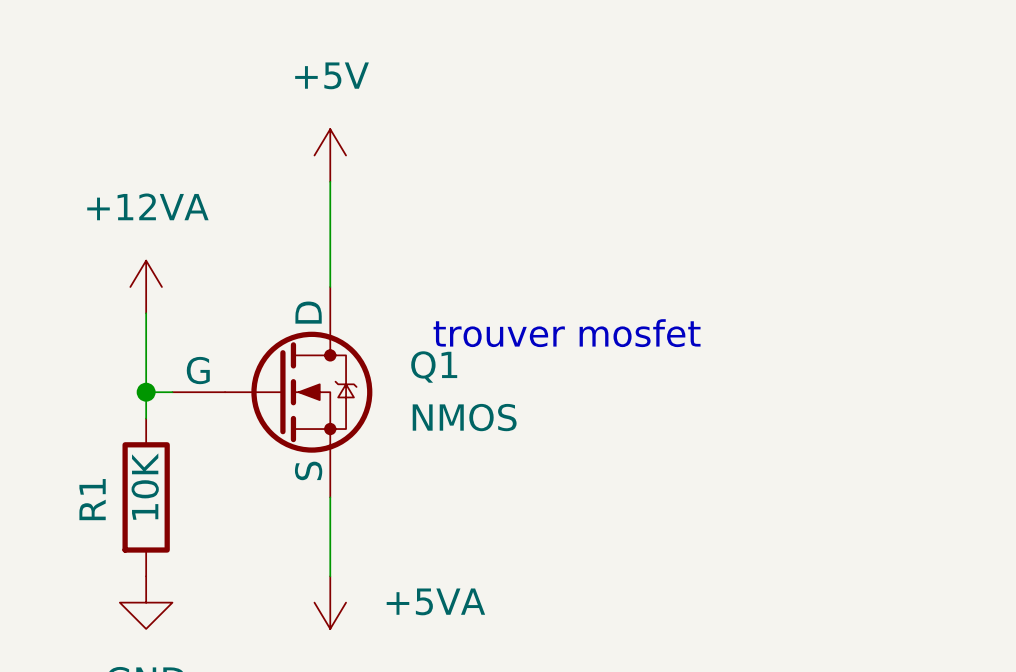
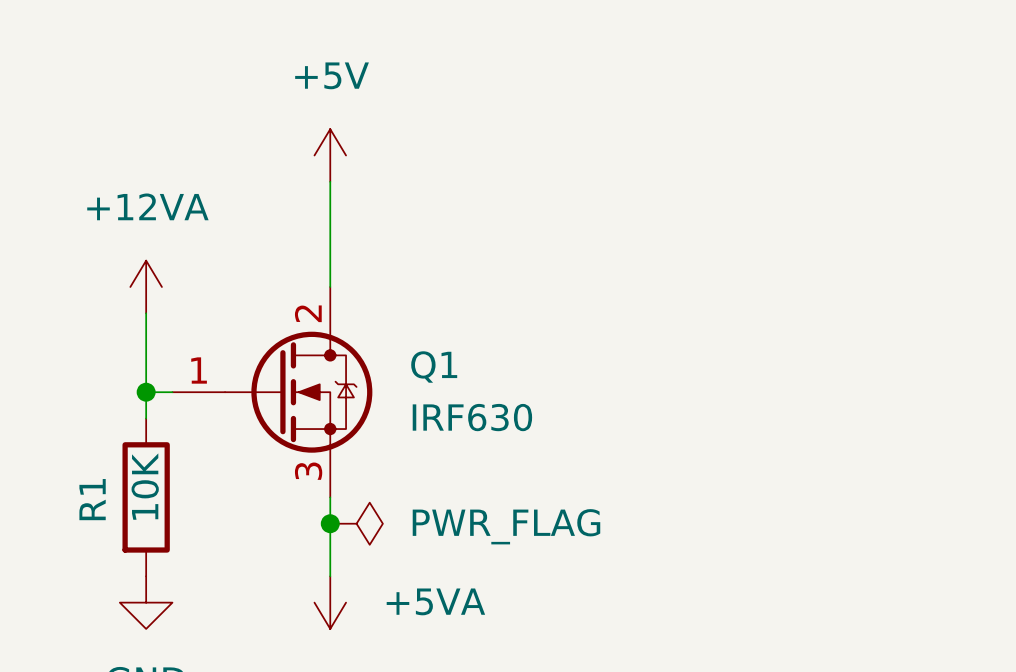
Q1 pin name: D (308, 312) -> none
Q1 pin number: none -> 2 (308, 313)
text: trouver mosfet (567, 333) -> none
Q1 pin name: G (198, 370) -> none
Q1 pin number: none -> 1 (199, 370)
Q1 value: NMOS (464, 417) -> IRF630 (472, 417)
Q1 pin name: S (308, 470) -> none
Q1 pin number: none -> 3 (308, 471)
junction: none -> (330, 523)
power symbol: none -> PWR_FLAG (356, 523)

